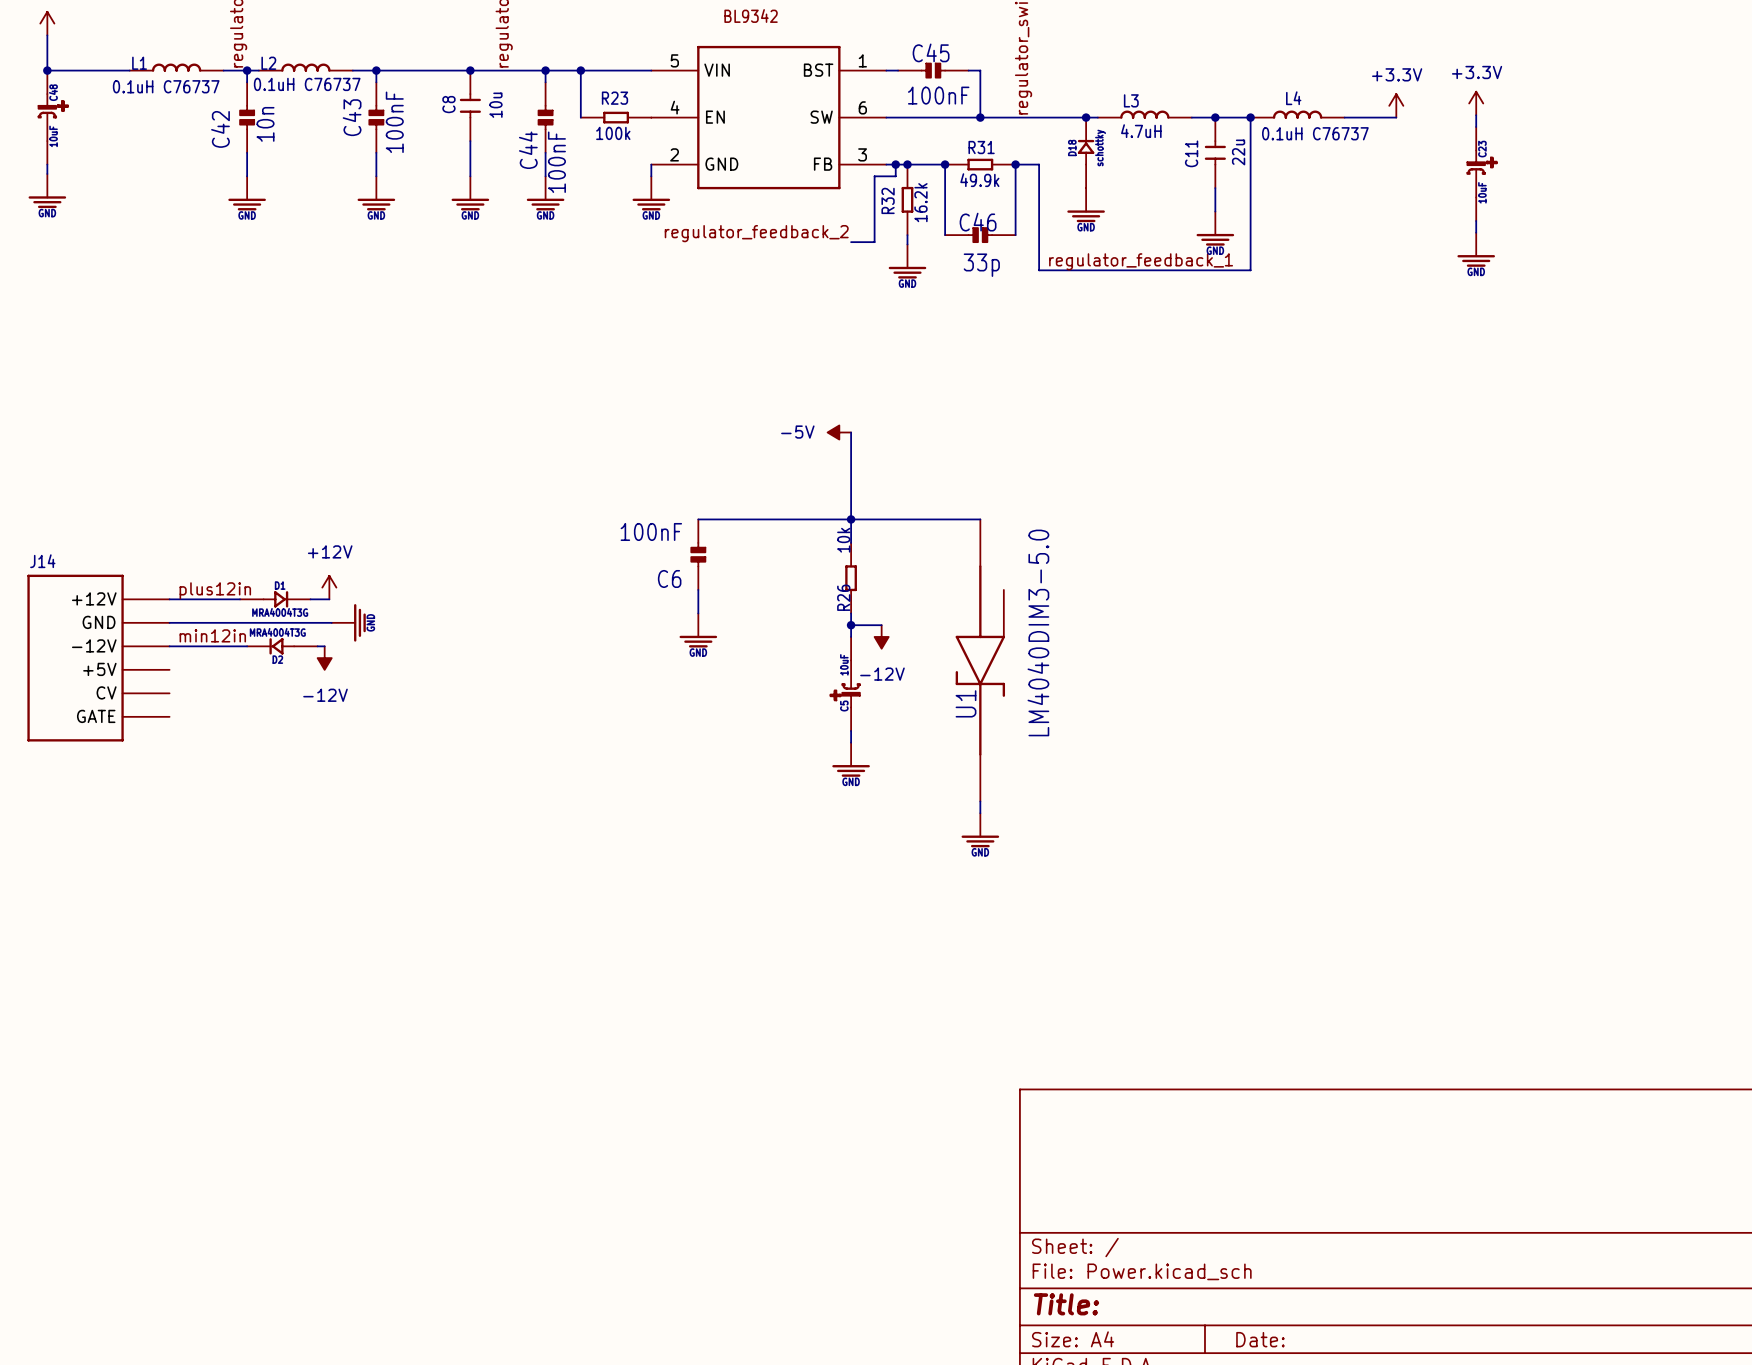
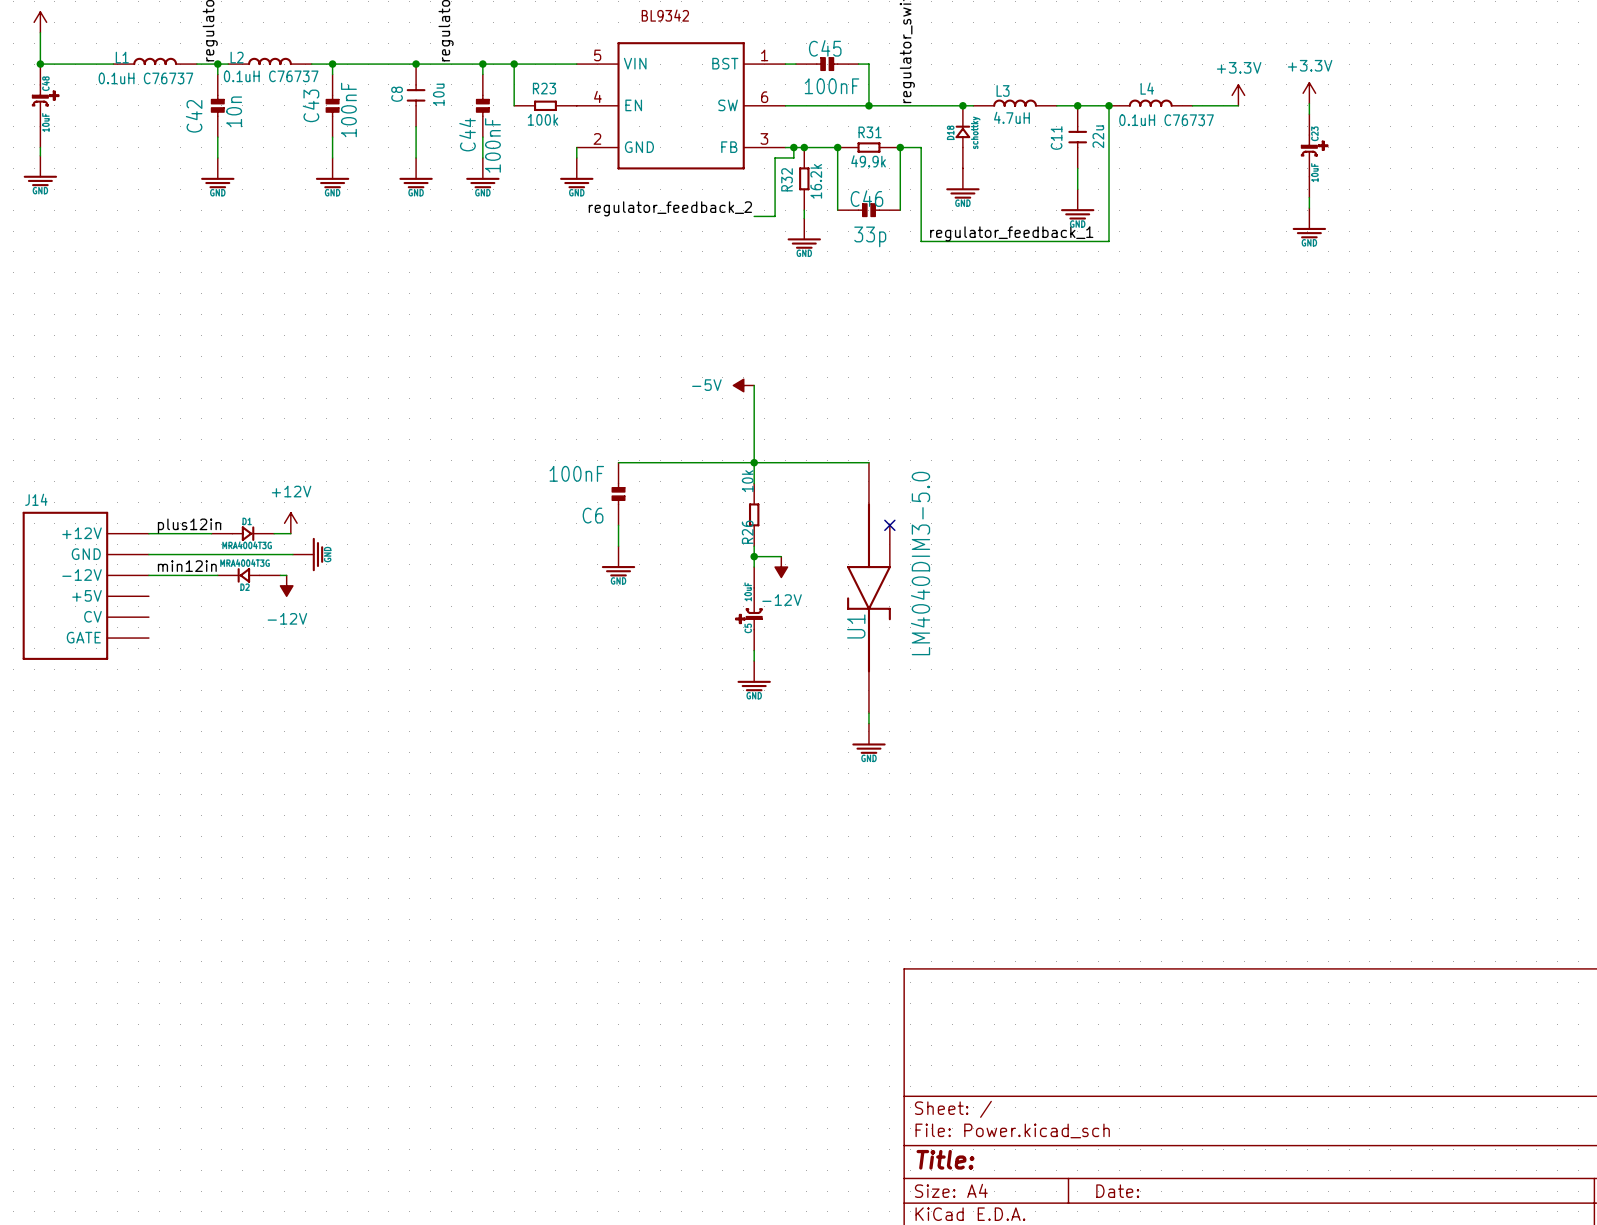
no-connect mark: none -> (889, 525)

